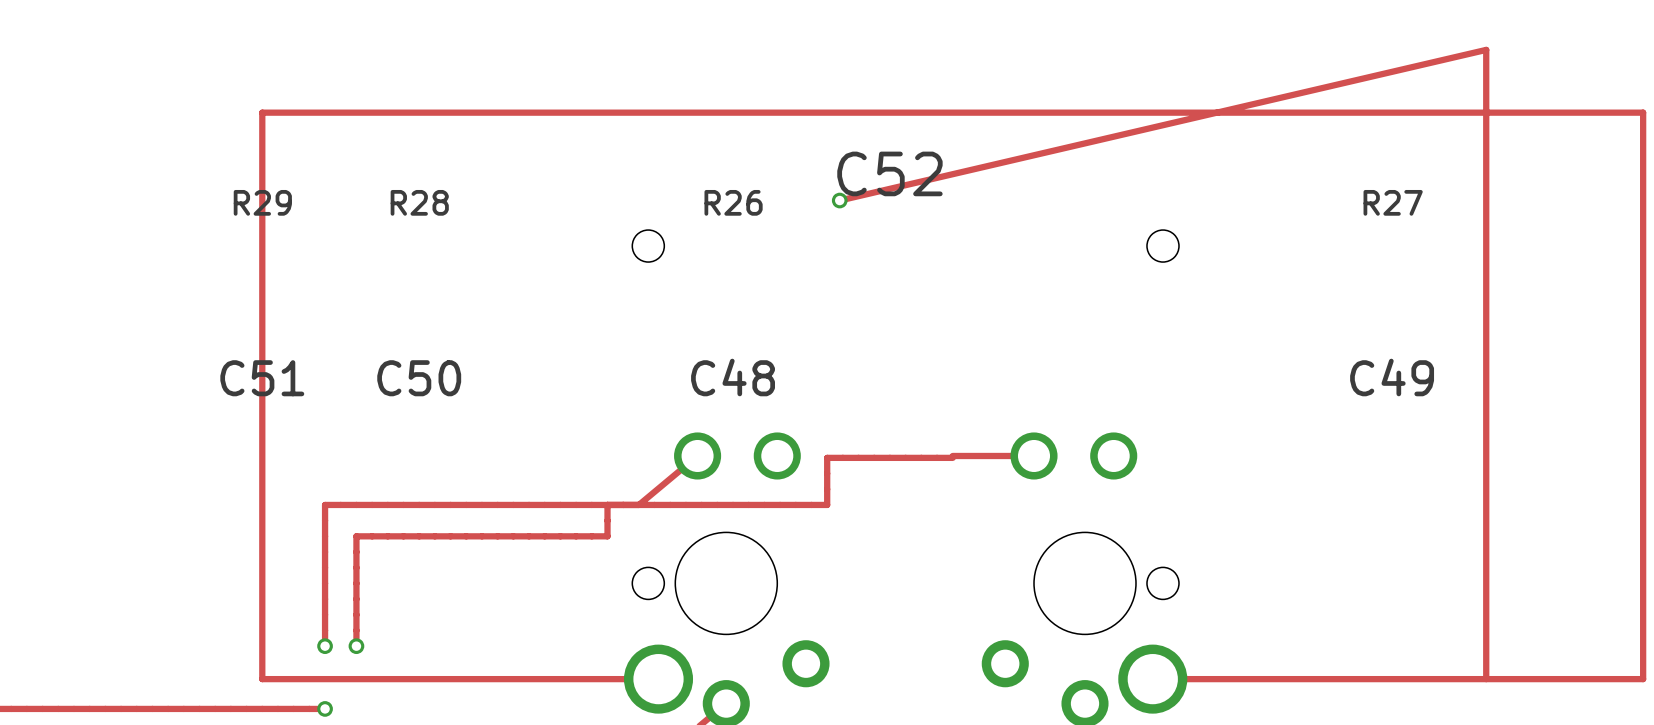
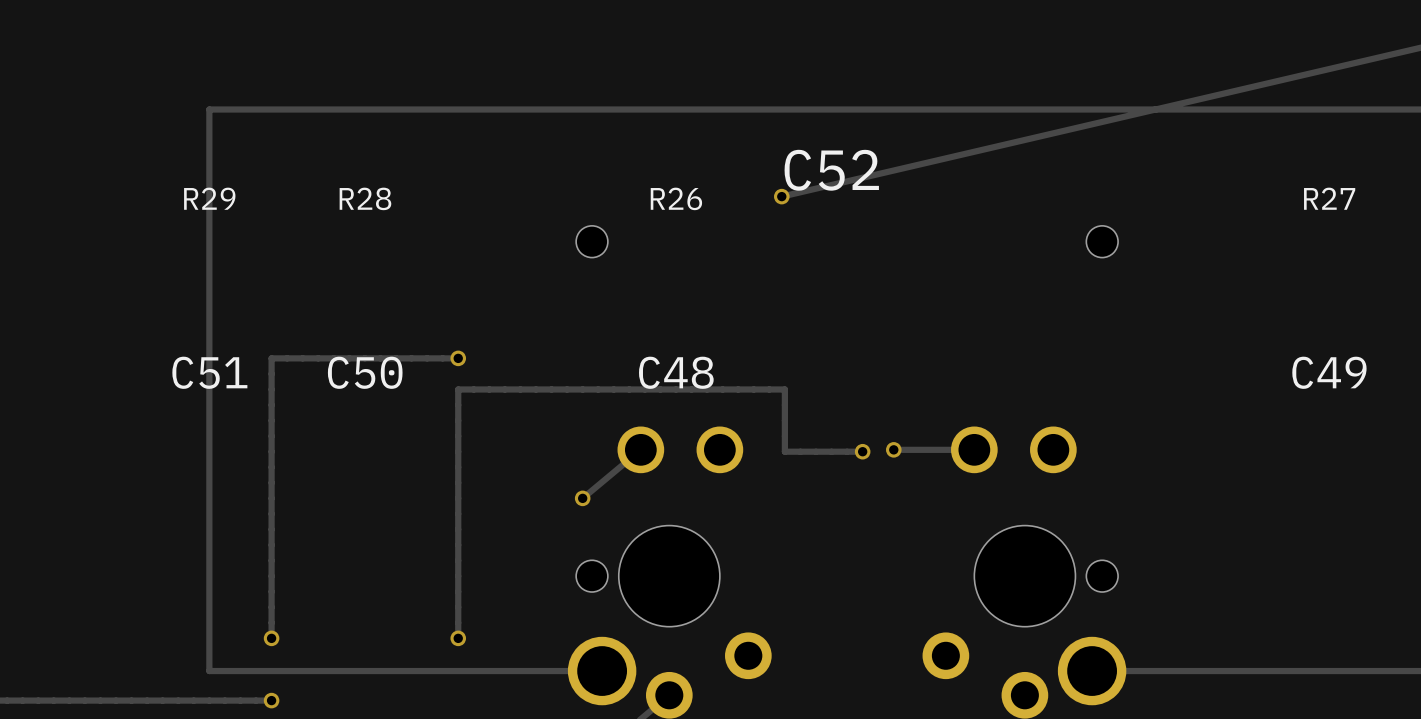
track: none -> (458, 358) (271, 358) (271, 498)
via: none -> (458, 358)
via: none -> (893, 449)
track: (842, 457) (827, 457) (827, 504) (325, 504) -> (784, 451) (784, 389) (458, 389) (458, 638)
track: (921, 457) (952, 457) -> none
via: none -> (862, 451)
track: (607, 504) (607, 536) (356, 536) (356, 646) -> none
via: none -> (582, 498)
via: (356, 646) -> none
via: none -> (458, 638)

